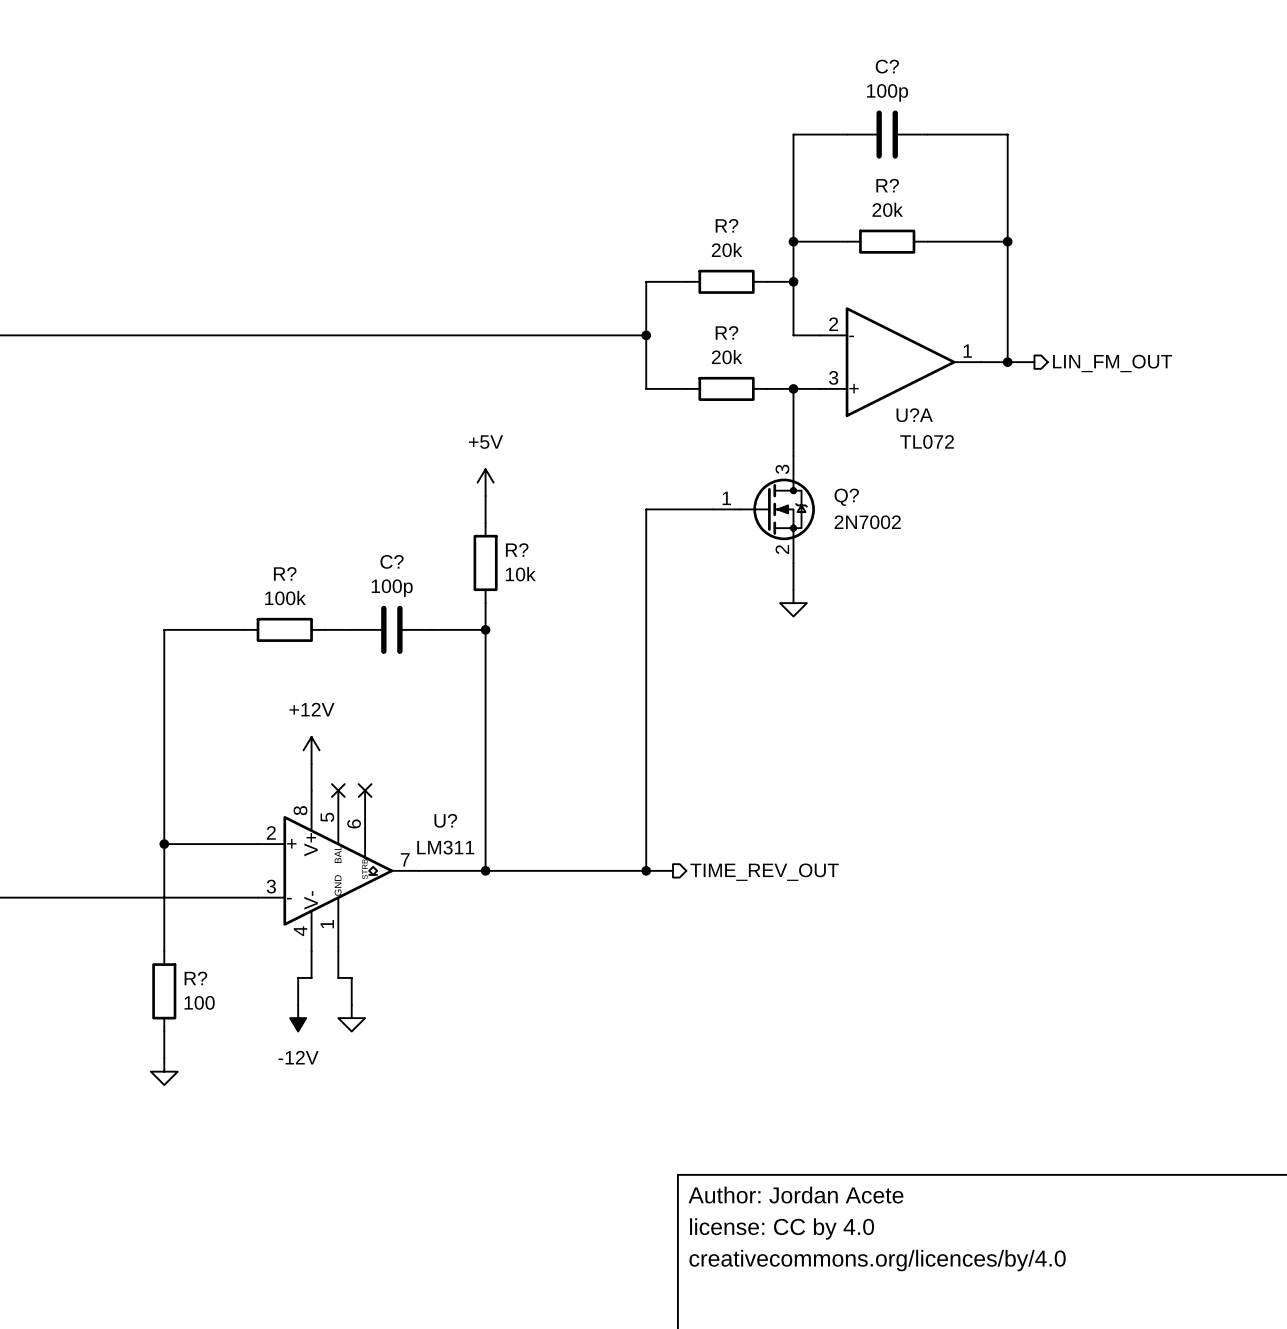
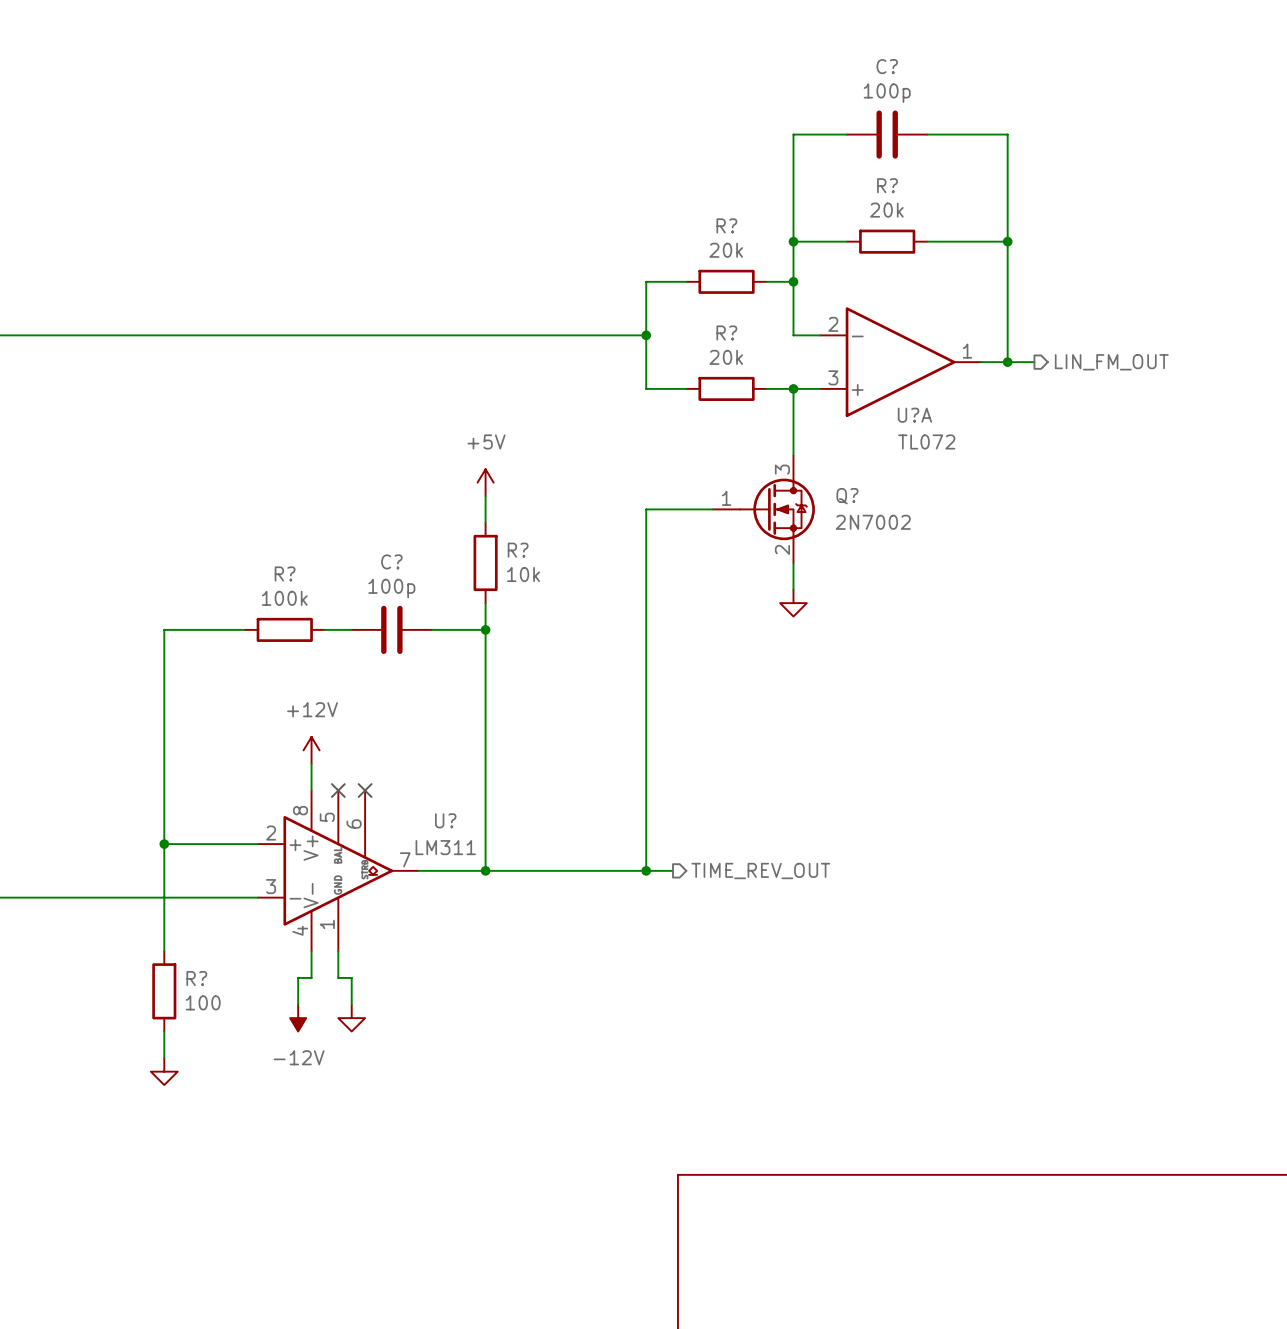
title block: Author: Jordan Acete (795, 1195) -> none
title block: license: CC by 4.0 (782, 1228) -> none
title block: creativecommons.org/licences/by/4.0 (877, 1260) -> none

